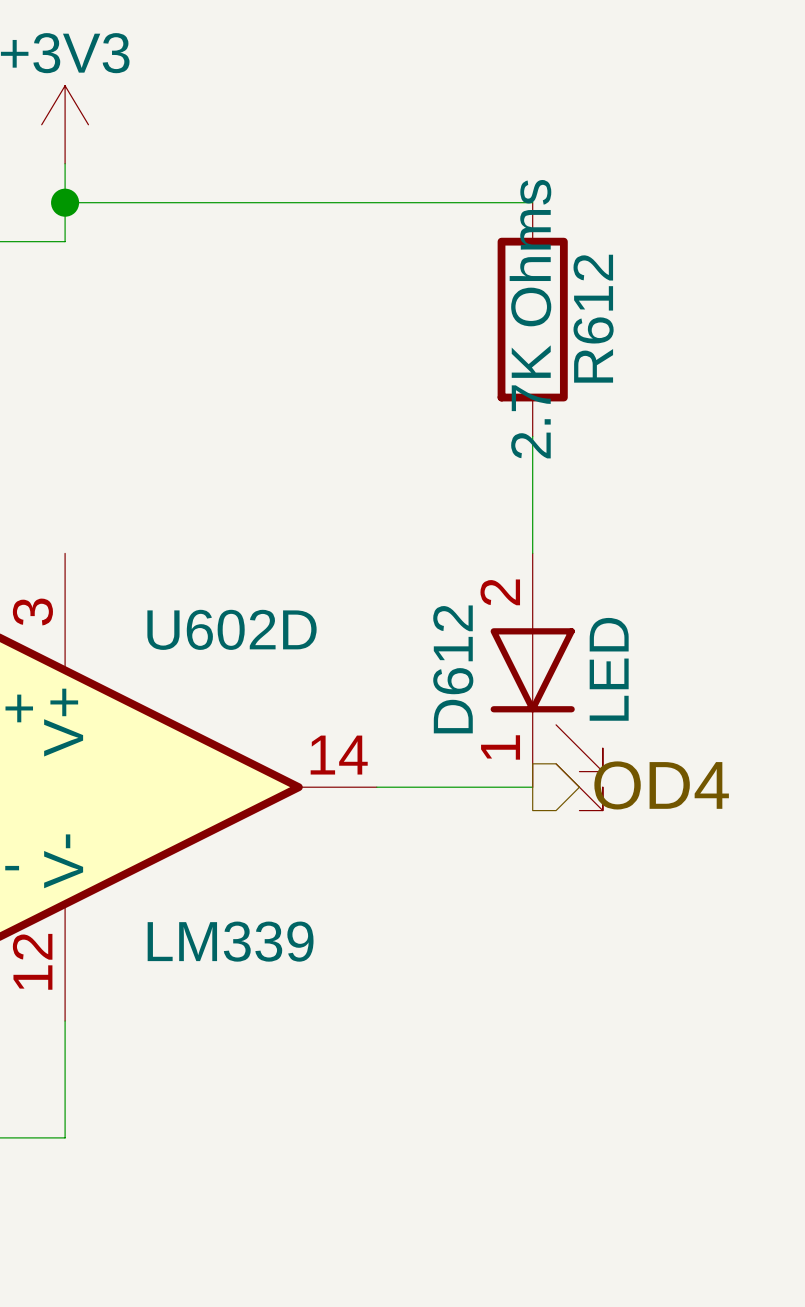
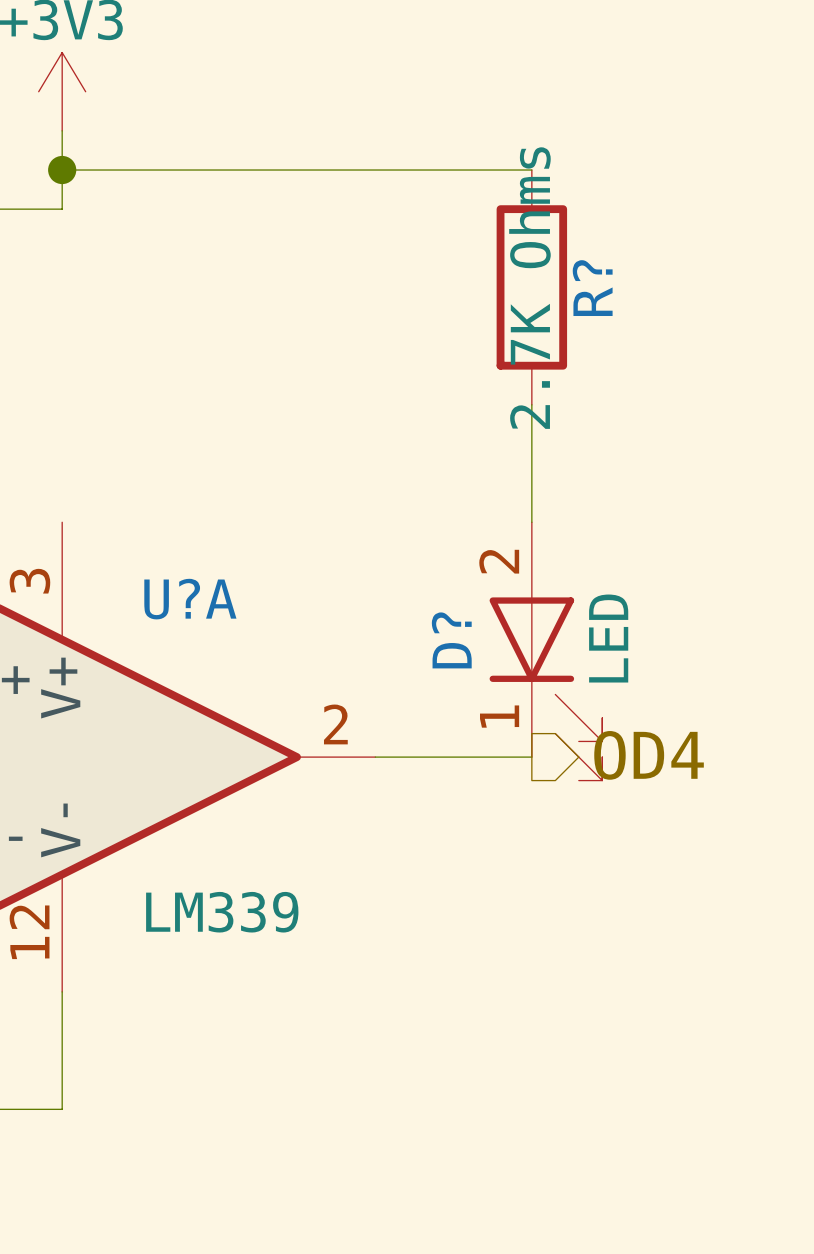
R612 name: R612 (593, 318) -> R? (592, 288)
U602D name: U602D (232, 629) -> U?A (190, 599)
D612 name: D612 (453, 669) -> D? (451, 640)
U602D pin number: 14 (339, 755) -> 2 (335, 724)

